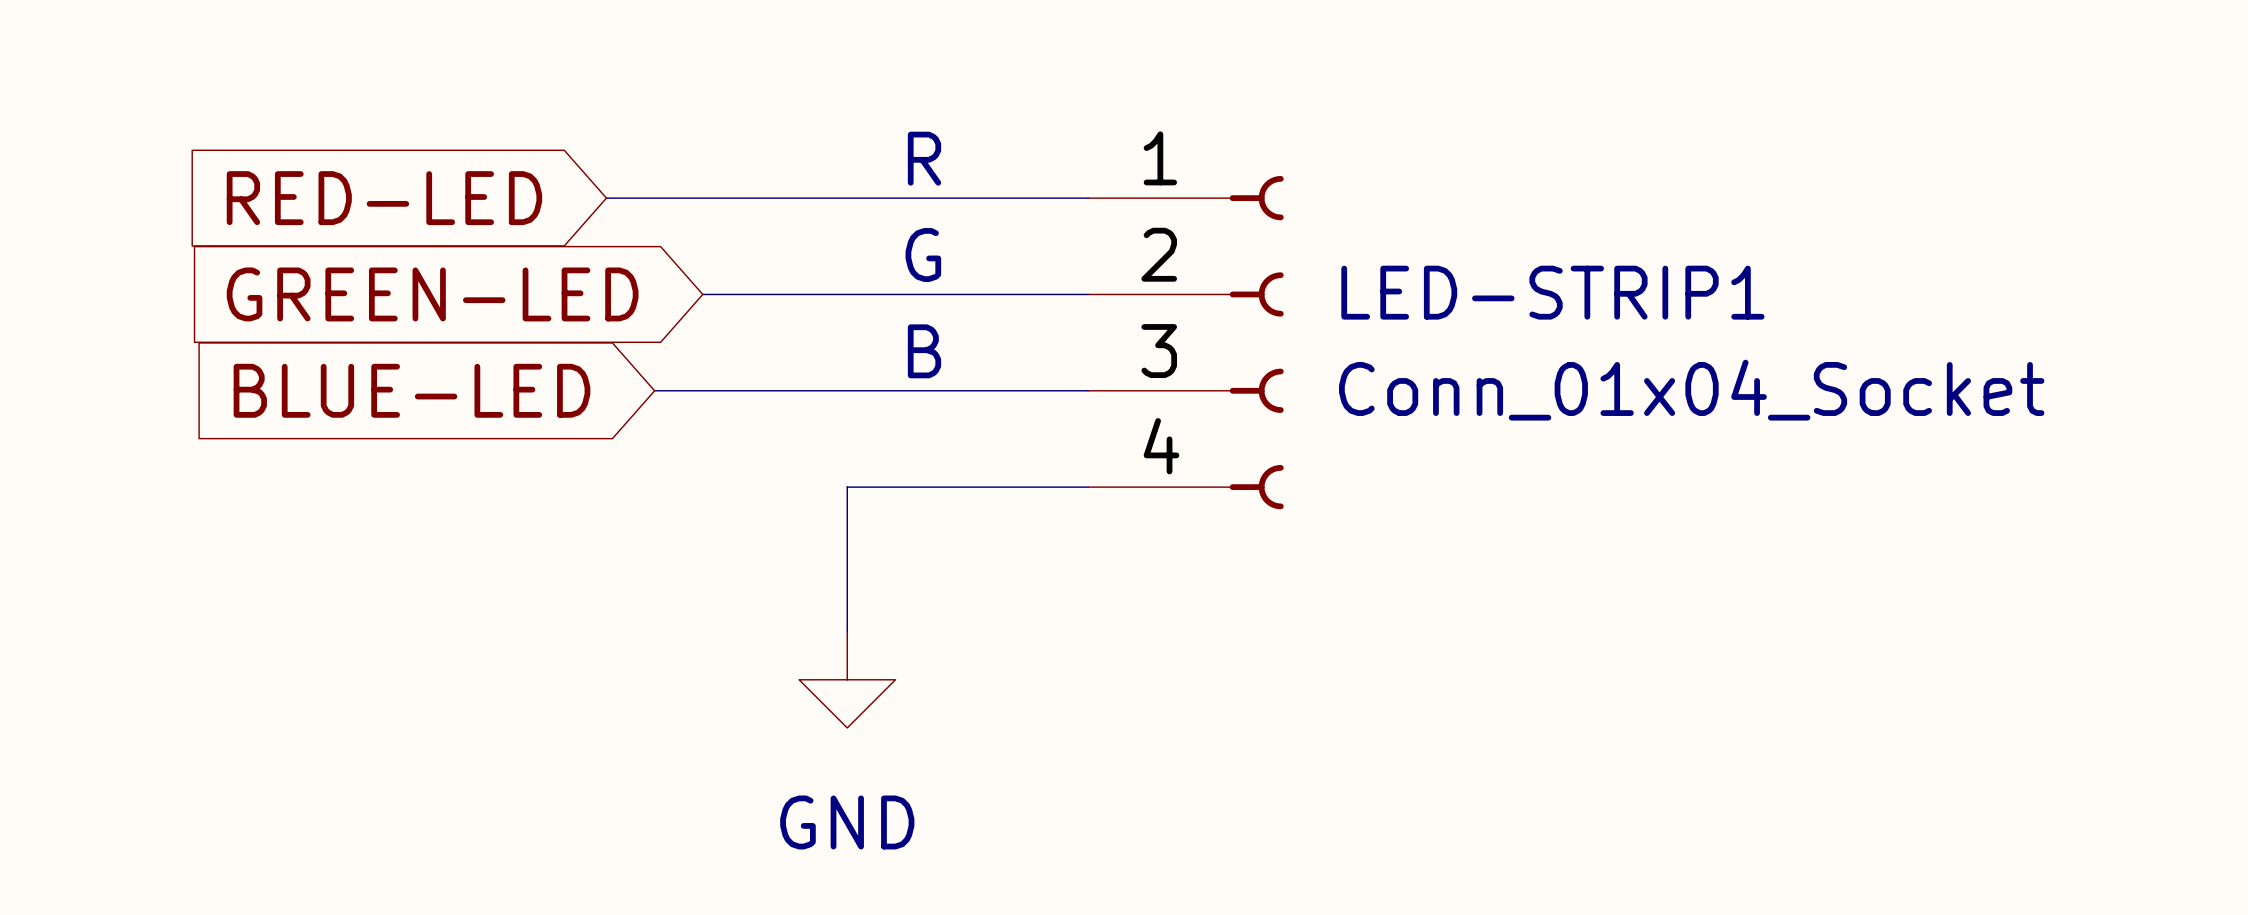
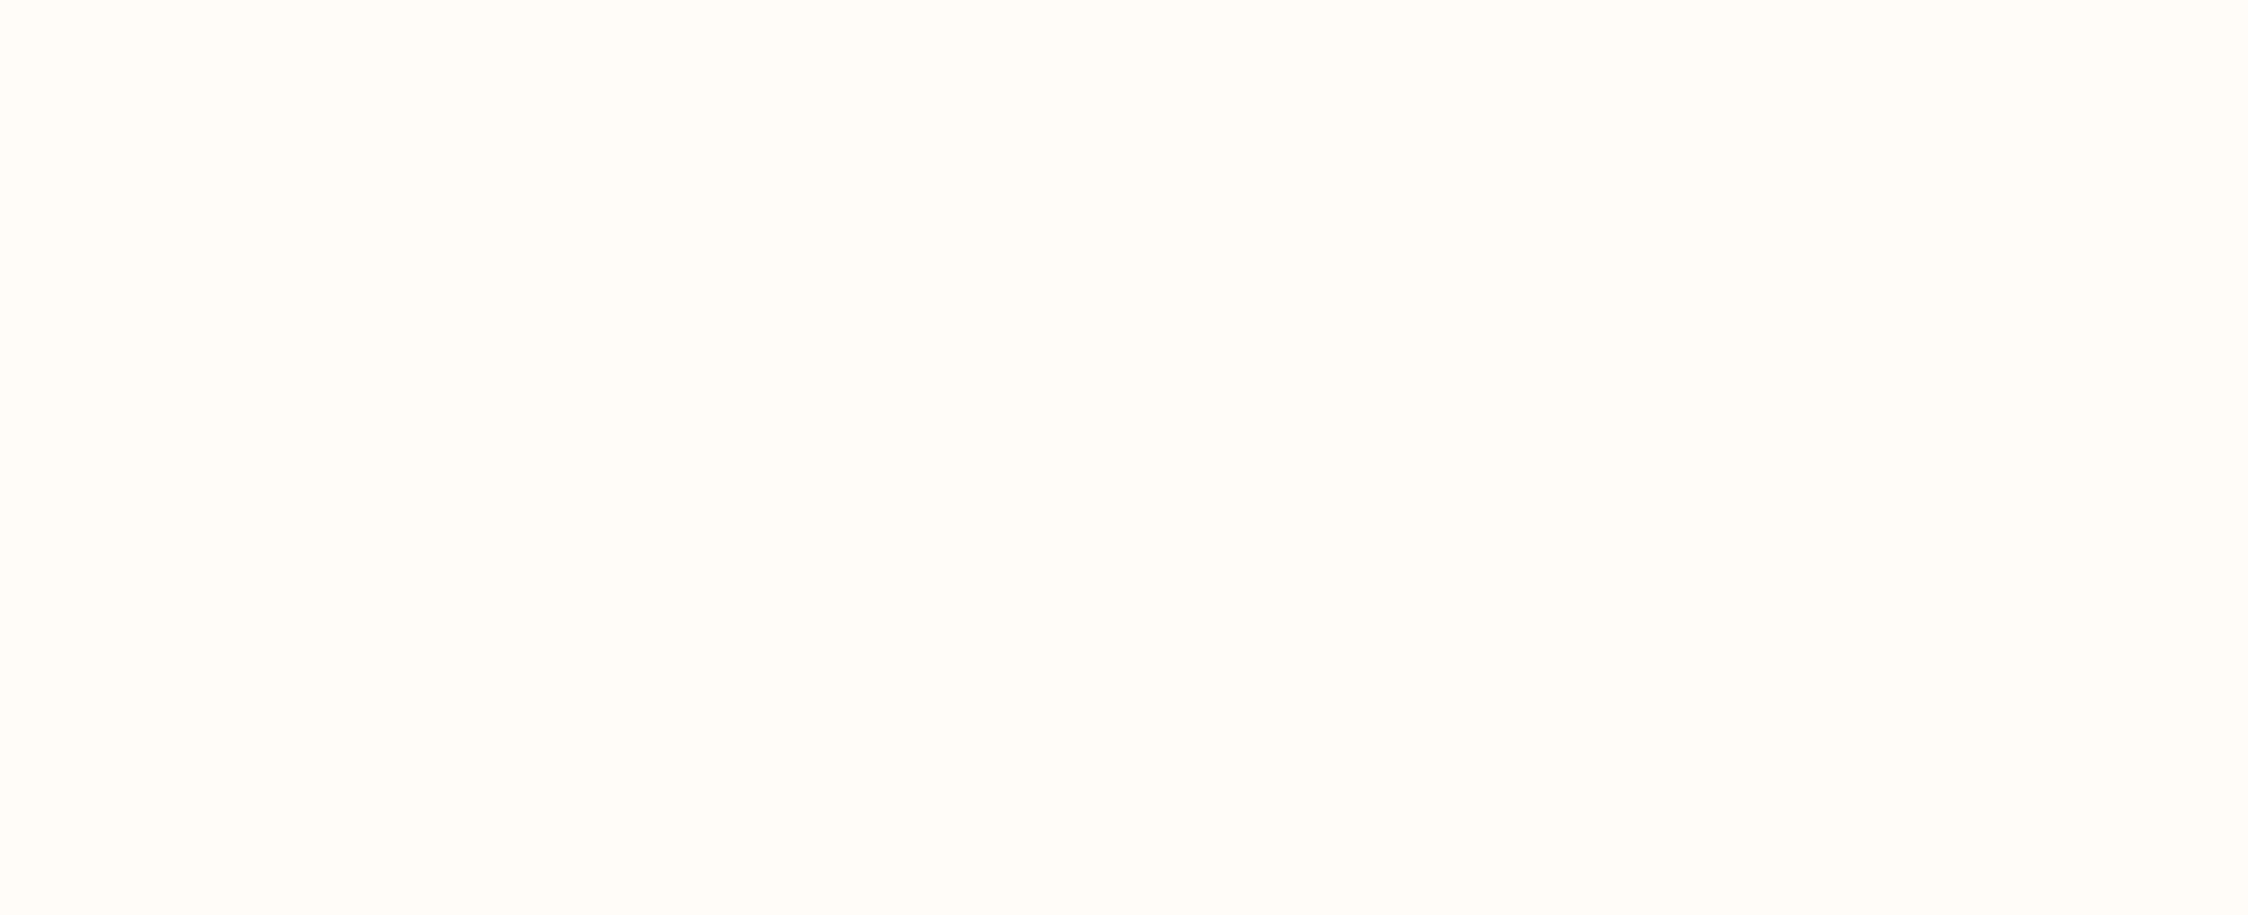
text: R (924, 158) -> none
global label: RED-LED (384, 198) -> none
wire: (606, 198) (1088, 198) -> none
text: G (923, 254) -> none
global label: GREEN-LED (432, 294) -> none
wire: (702, 294) (1088, 294) -> none
LED-STRIP1: Conn_01x04_Socket (1185, 342) -> none
text: B (924, 351) -> none
global label: BLUE-LED (411, 390) -> none
wire: (654, 390) (1088, 390) -> none
wire: (1088, 487) (847, 487) (847, 631) -> none
power symbol: GND (847, 679) -> none

